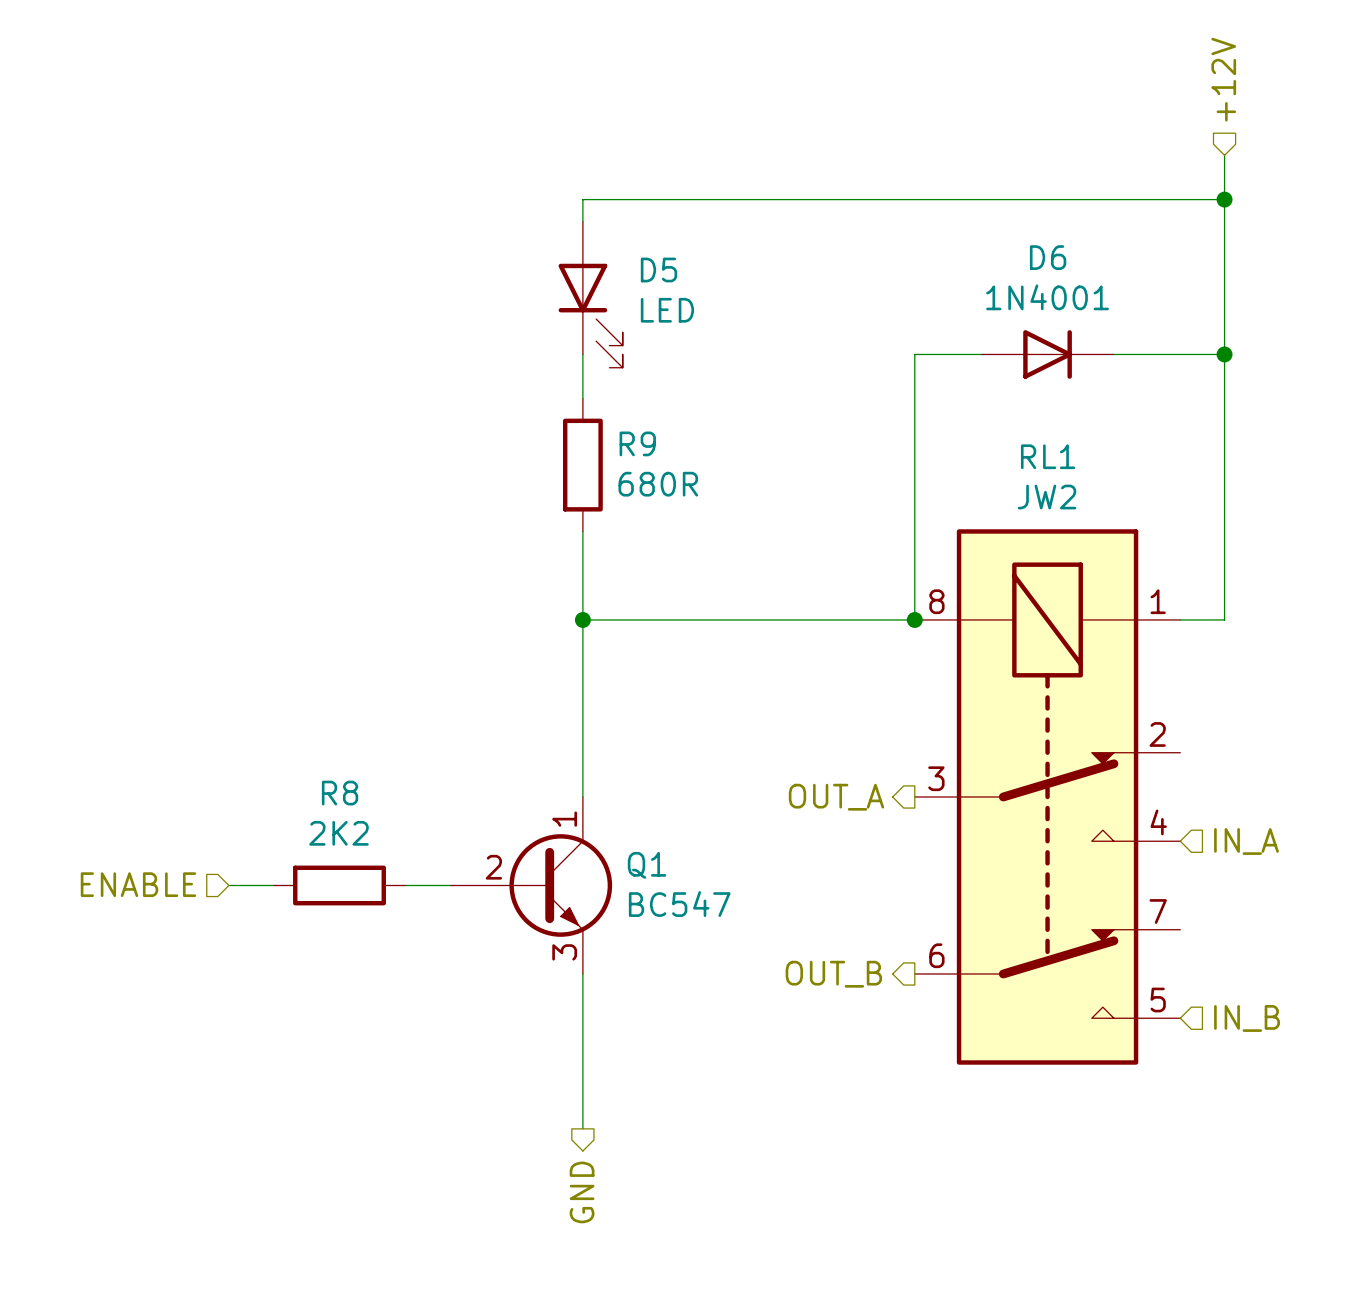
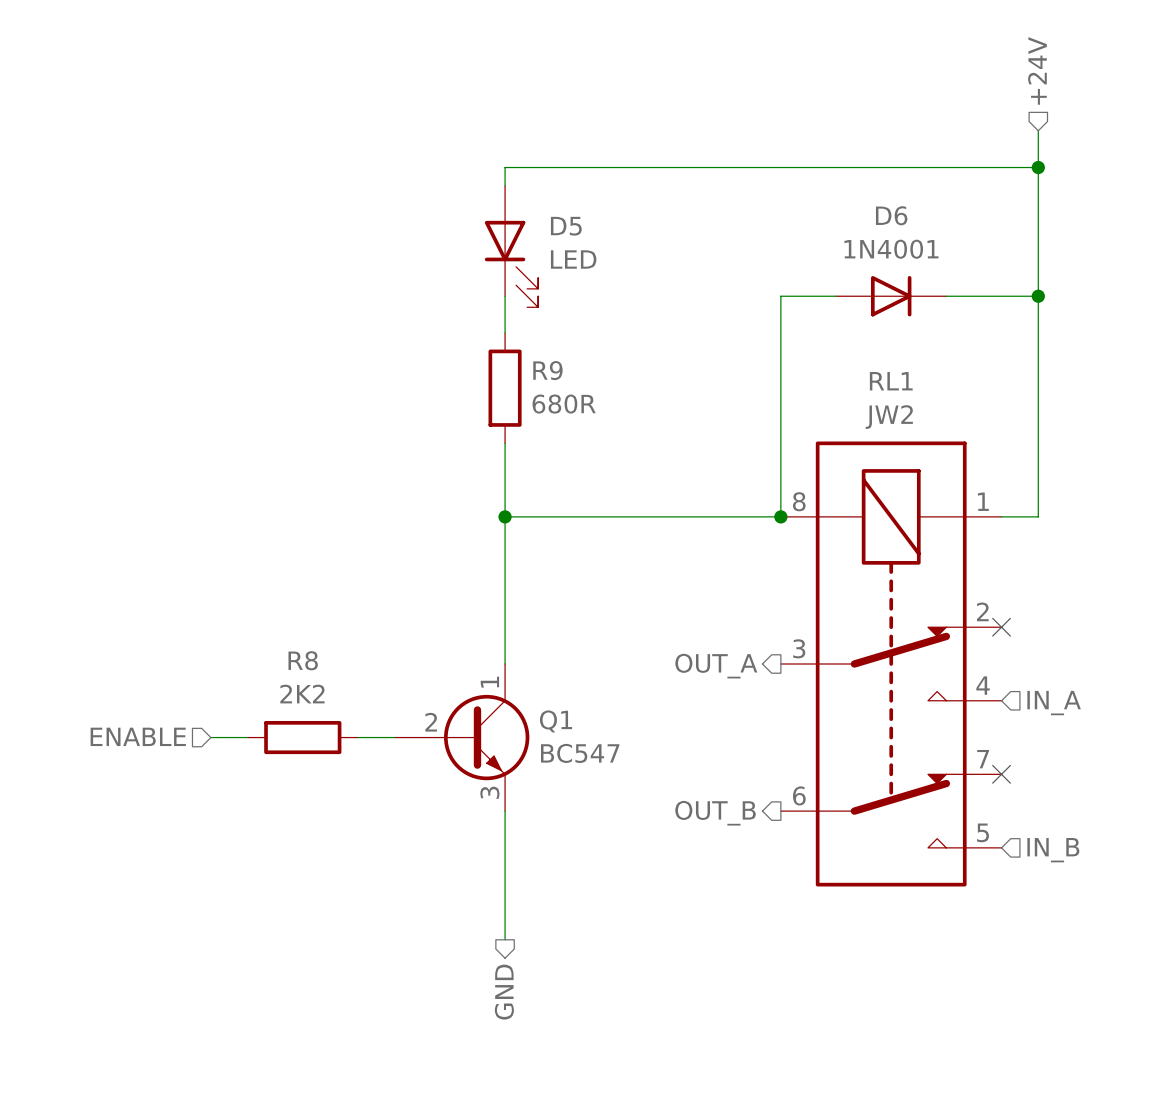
hierarchical label: +12V (1223, 79) -> +24V (1037, 70)
no-connect mark: none -> (1001, 627)
no-connect mark: none -> (1001, 774)

